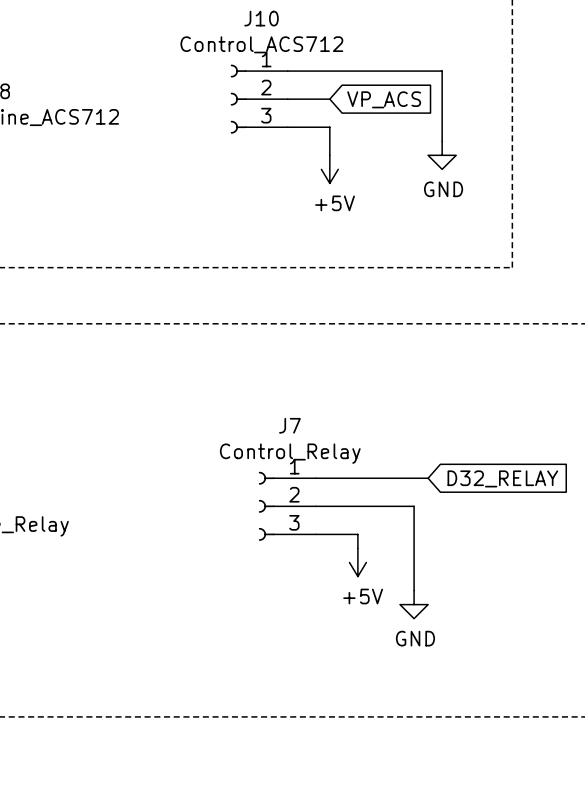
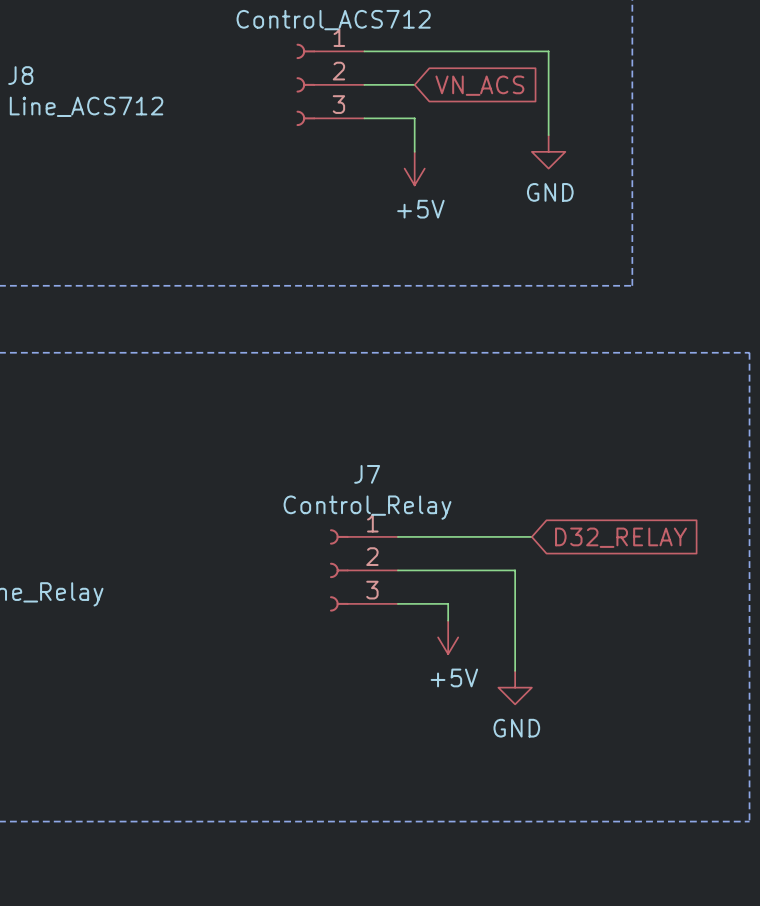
global label: VP_ACS (384, 99) -> VN_ACS (479, 85)

